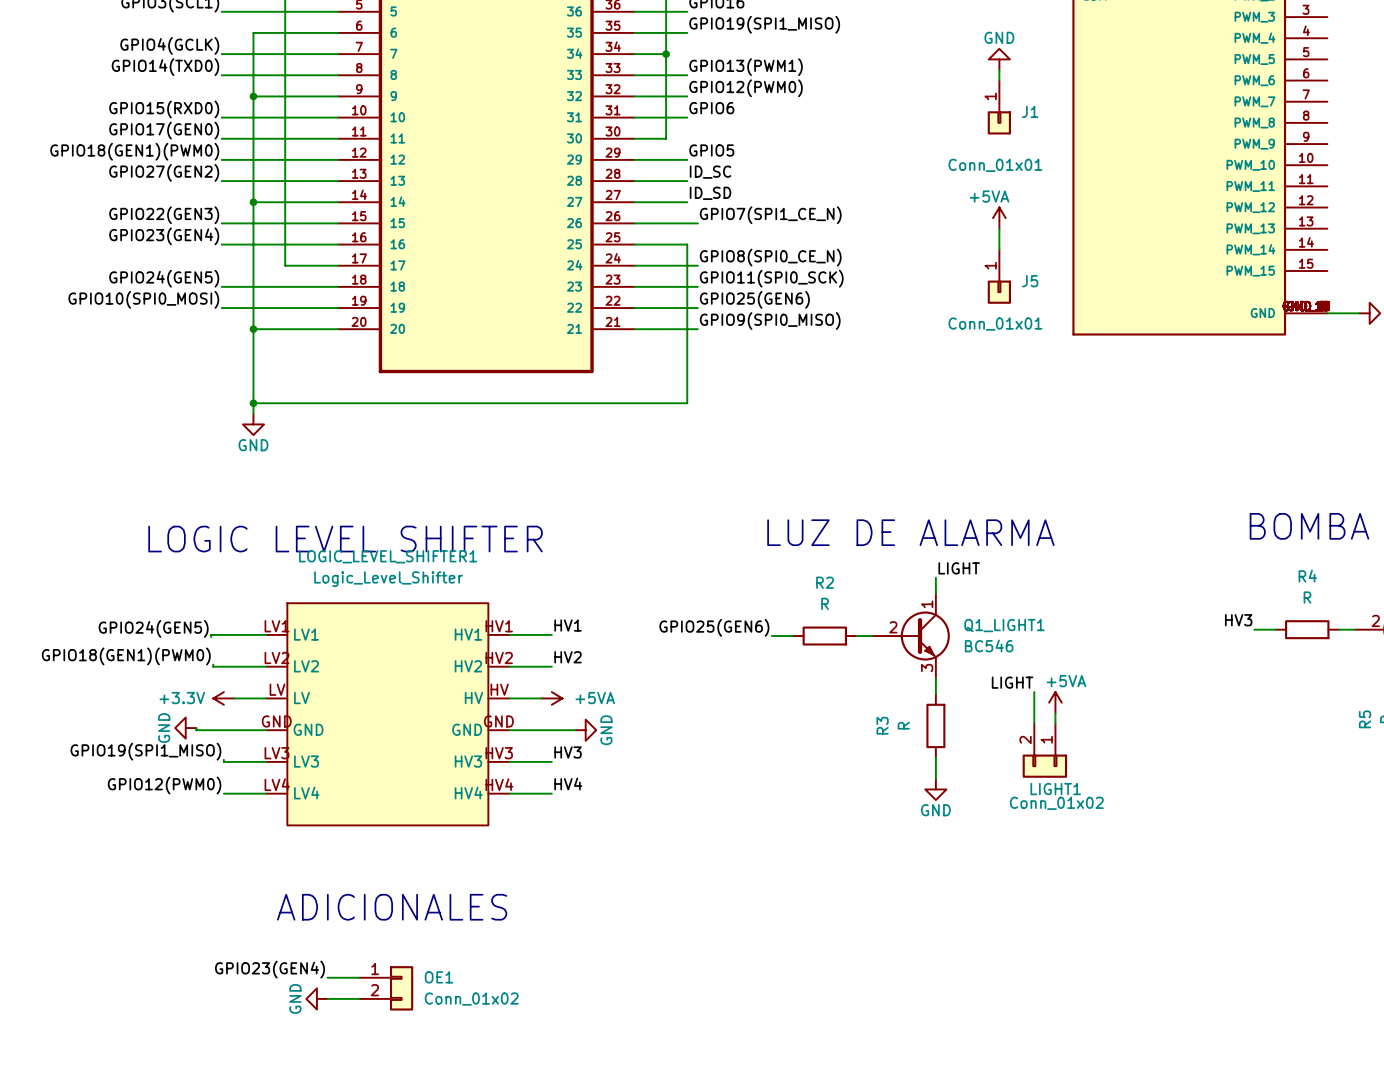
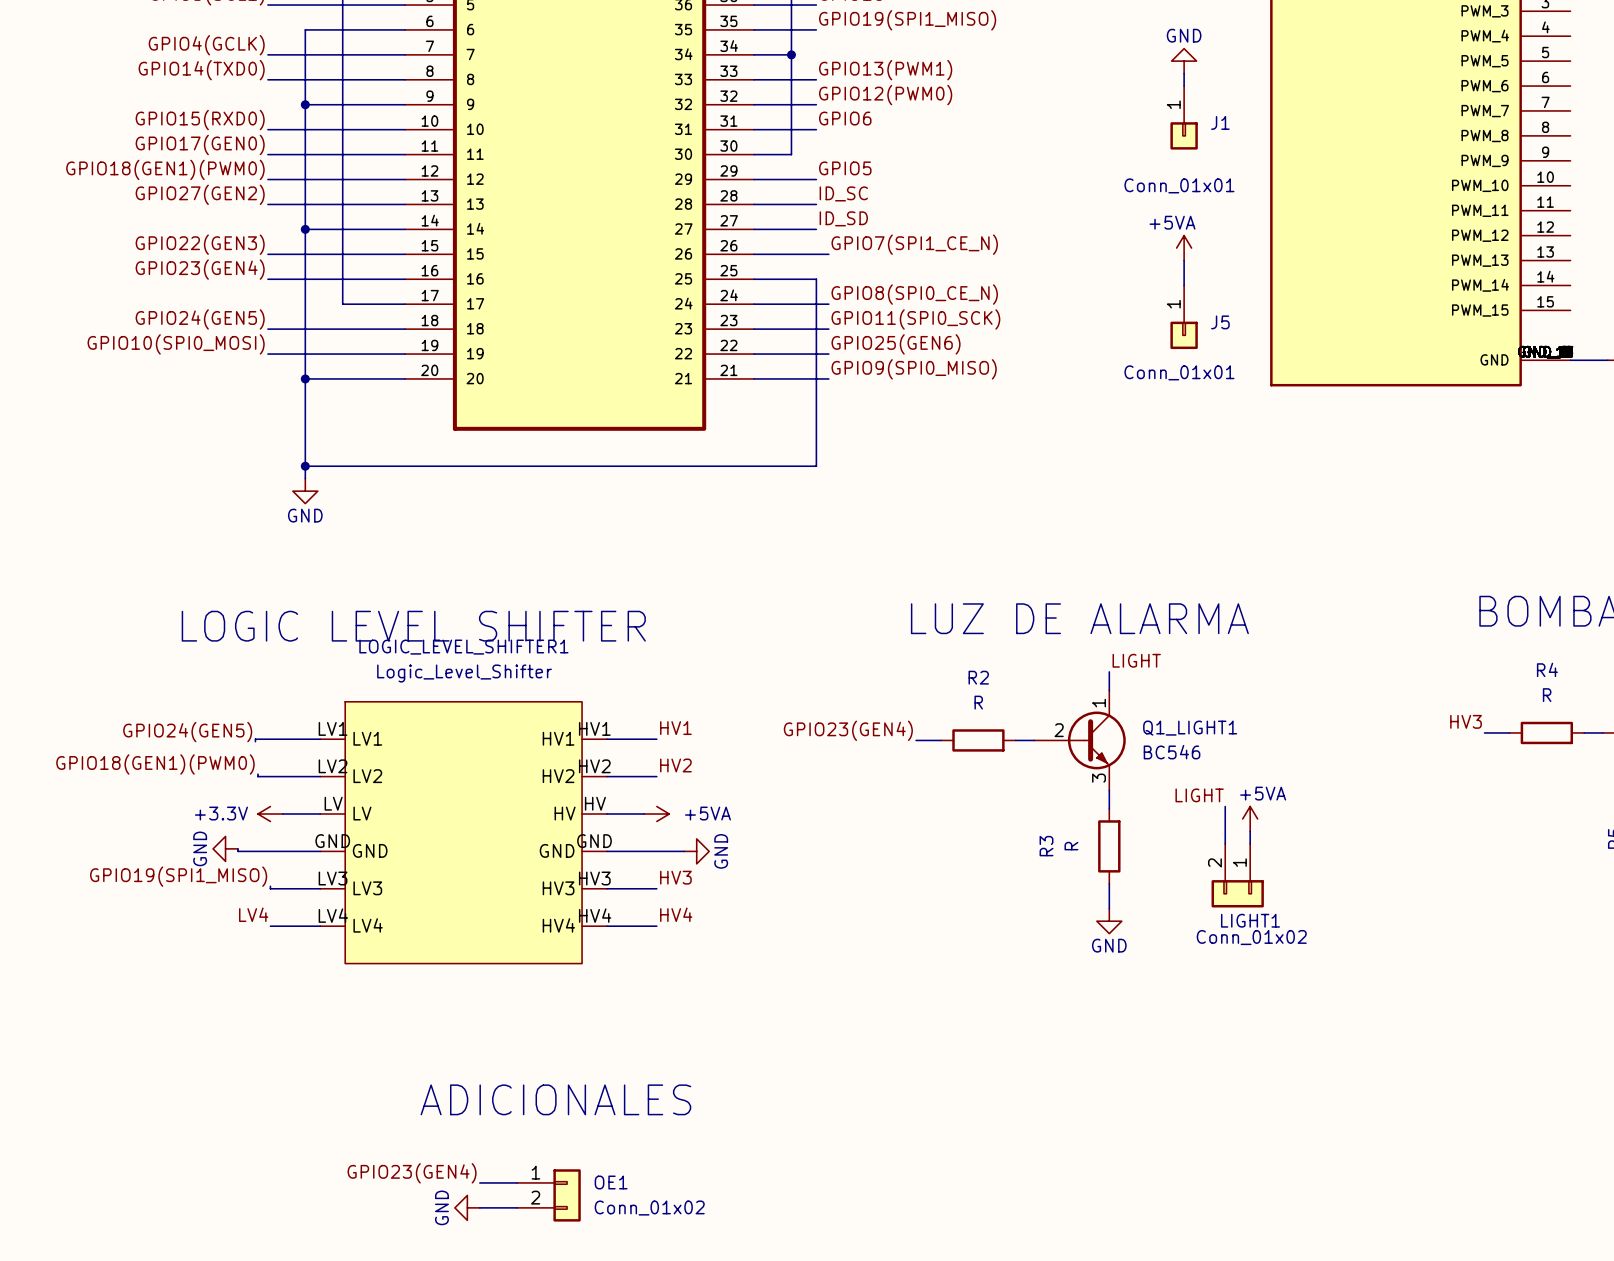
label: GPIO25(GEN6) (714, 627) -> GPIO23(GEN4) (848, 730)
label: GPIO12(PWM0) (164, 785) -> LV4 (253, 914)
text position: ADICIONALES (392, 907) -> ADICIONALES (555, 1099)
label position: GPIO23(GEN4) (270, 969) -> GPIO23(GEN4) (412, 1173)
wire: (327, 977) (359, 977) -> (479, 1207) (517, 1207)
OE1 position: (386, 988) -> (549, 1195)
power symbol position: GND (316, 998) -> GND (467, 1207)
wire: (327, 998) (359, 998) -> (479, 1182) (517, 1182)

